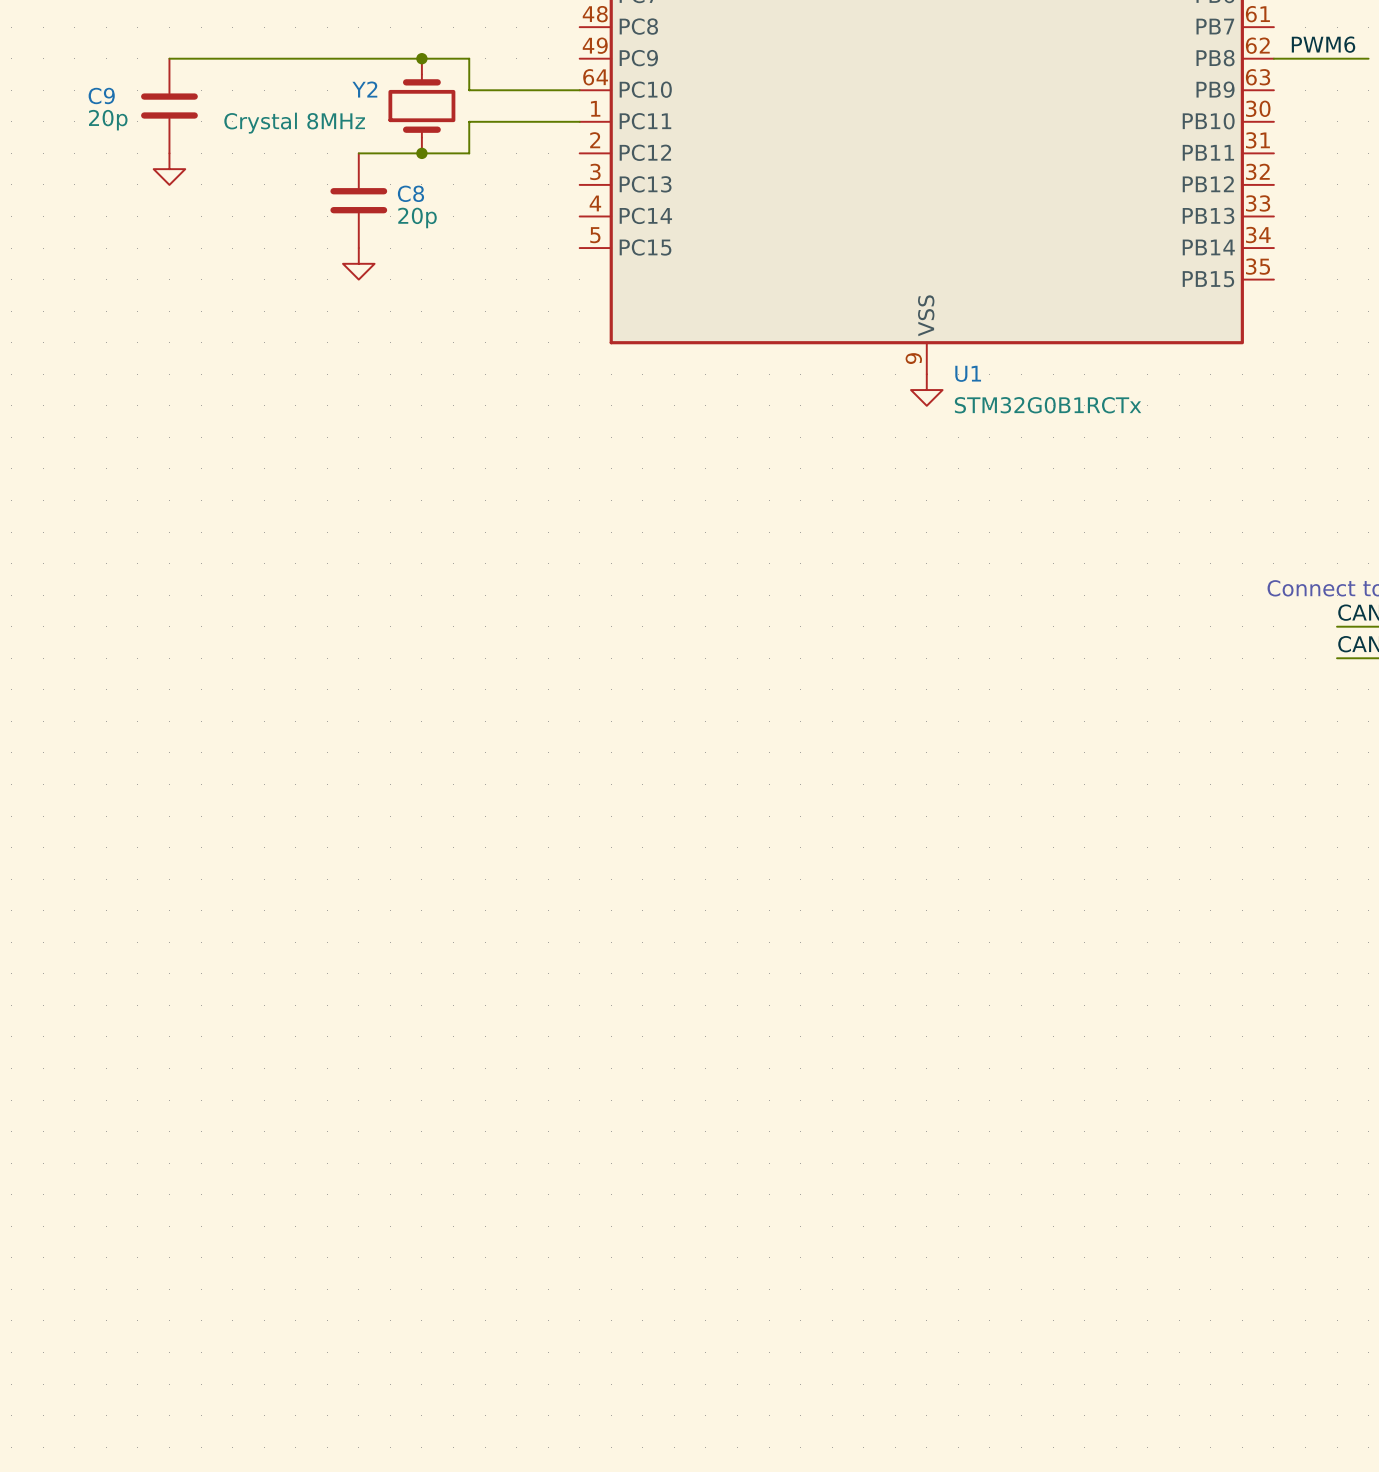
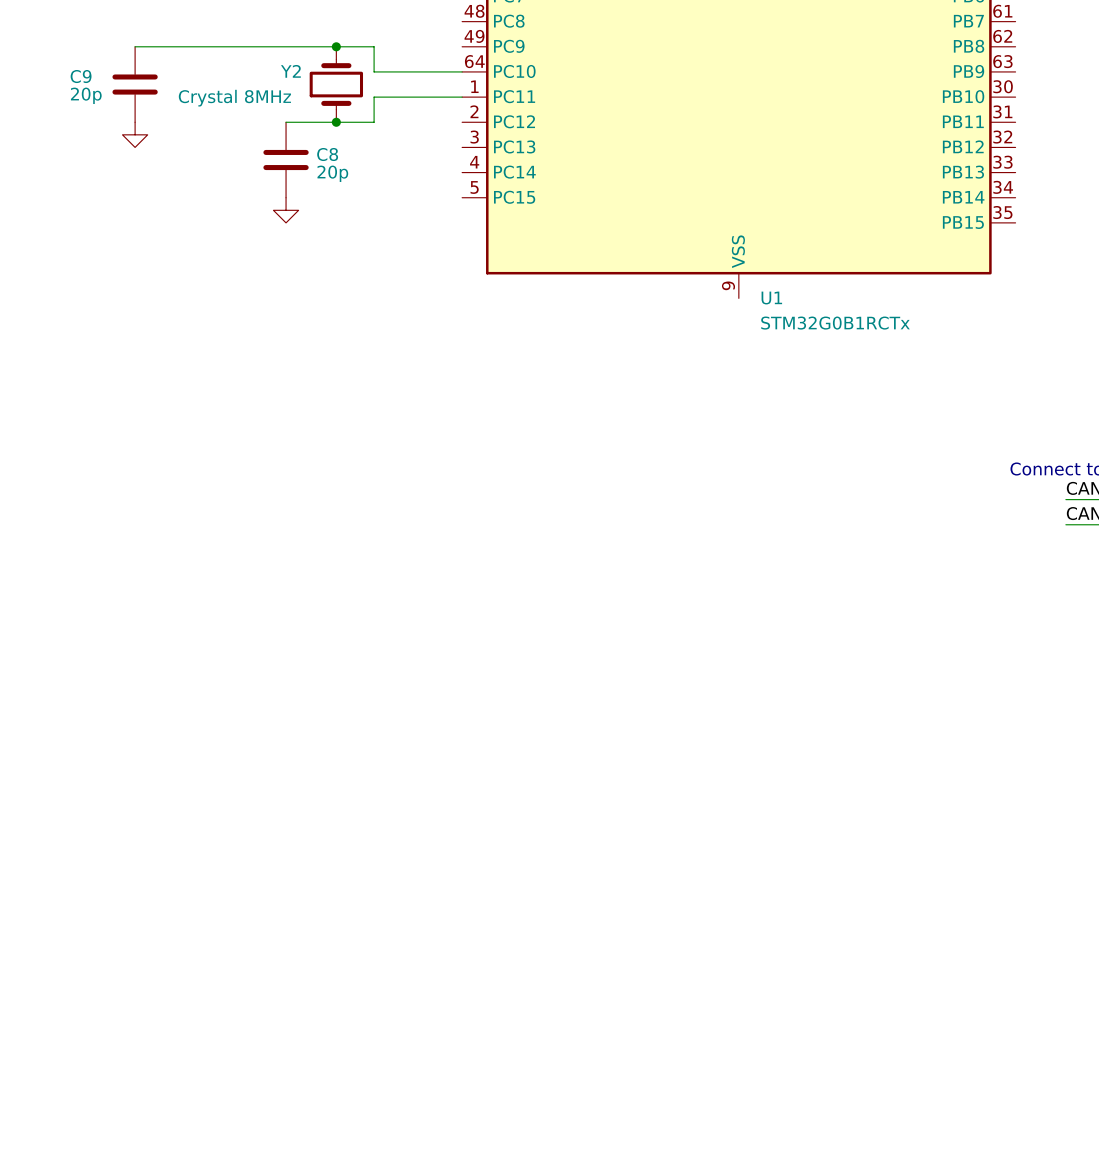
label: PWM6 (1323, 44) -> none
wire: (1273, 58) (1368, 58) -> none
power symbol: (926, 390) -> none

